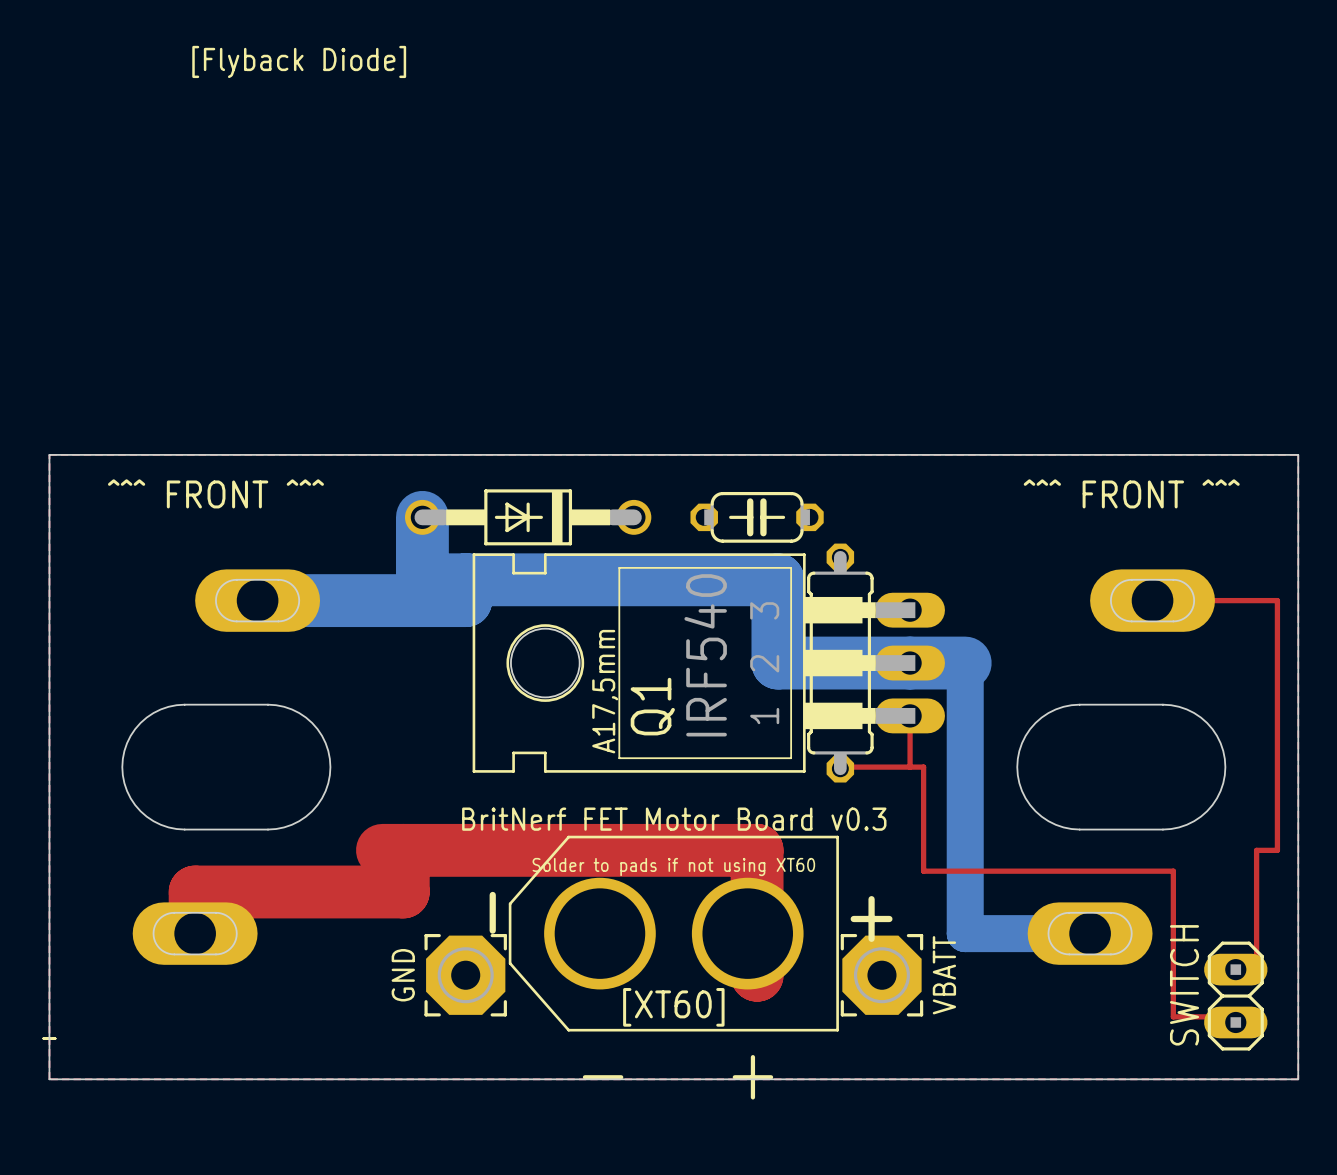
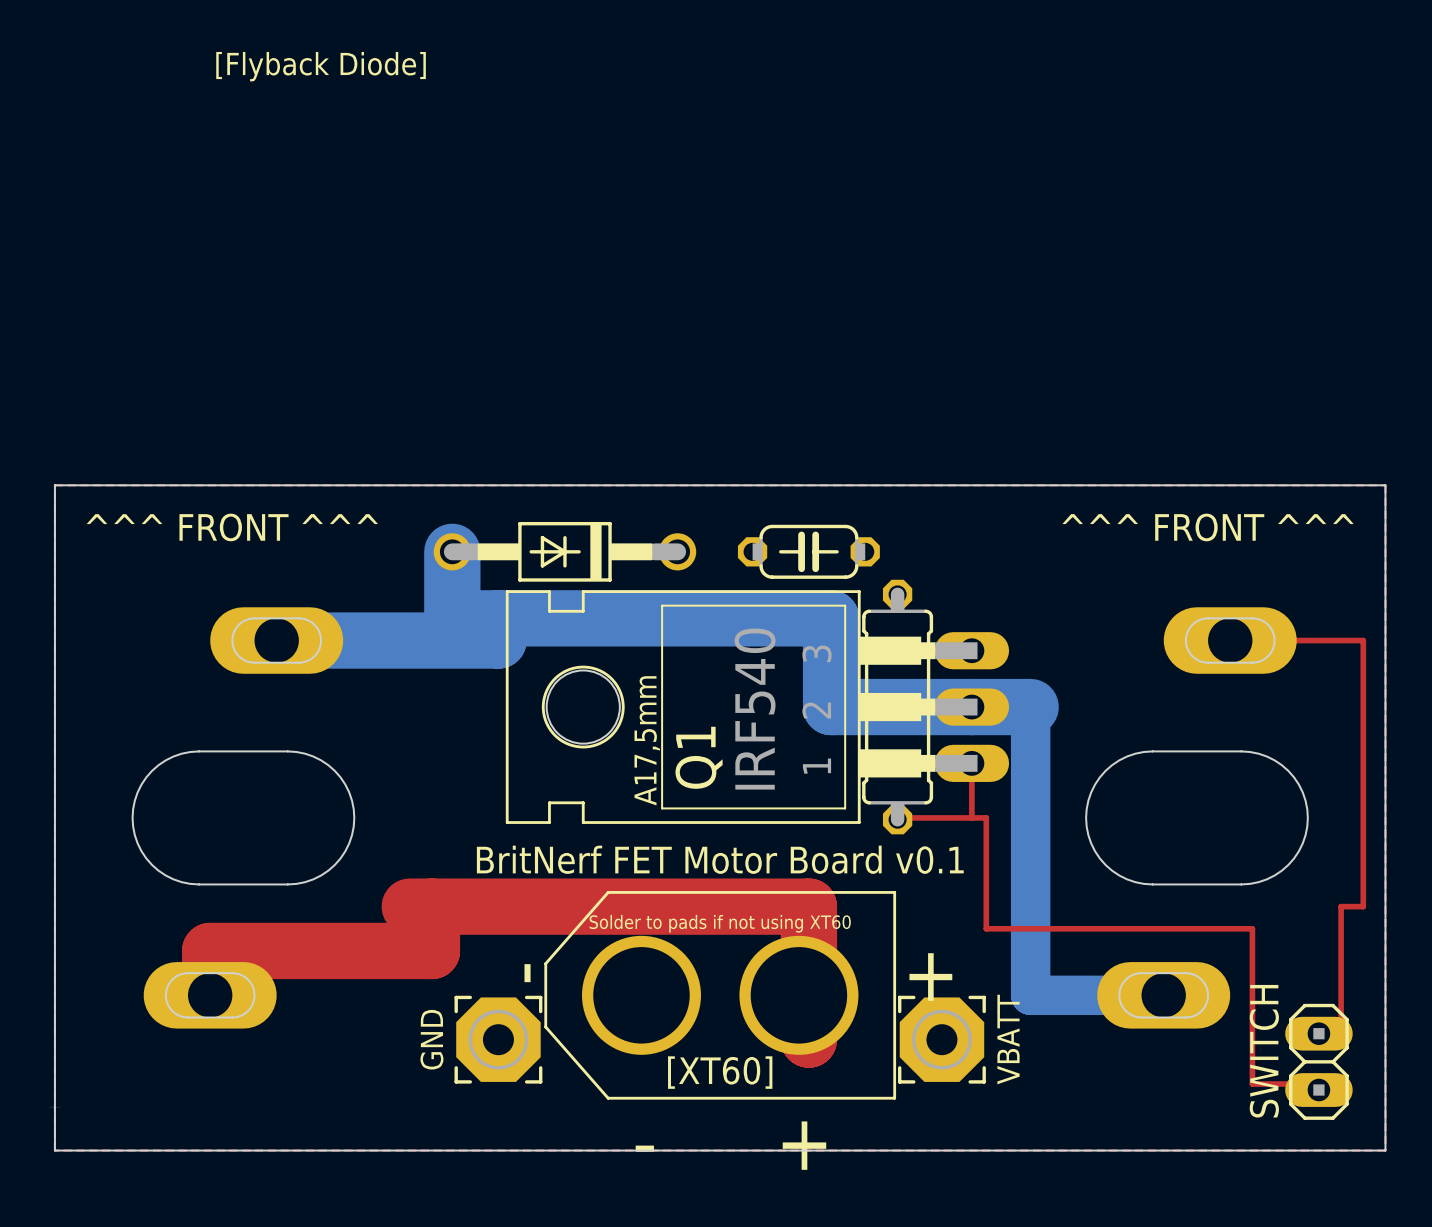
text: BritNerf FET Motor Board v0.3 (674, 819) -> BritNerf FET Motor Board v0.1 (720, 859)

